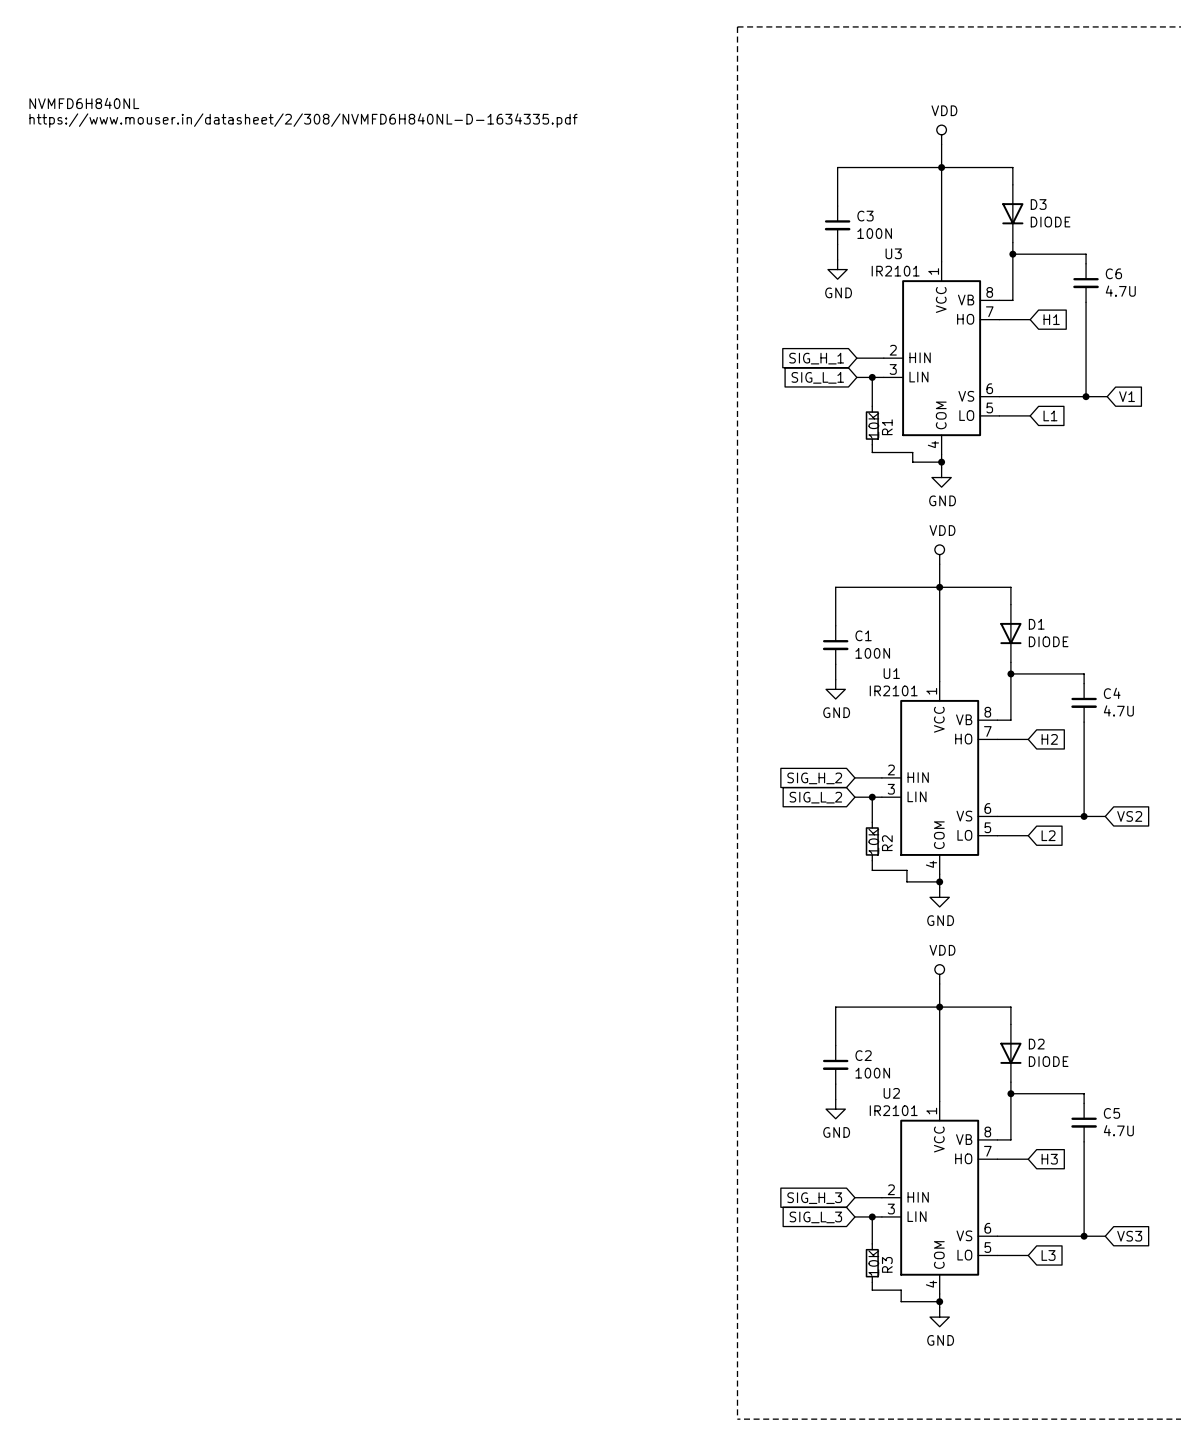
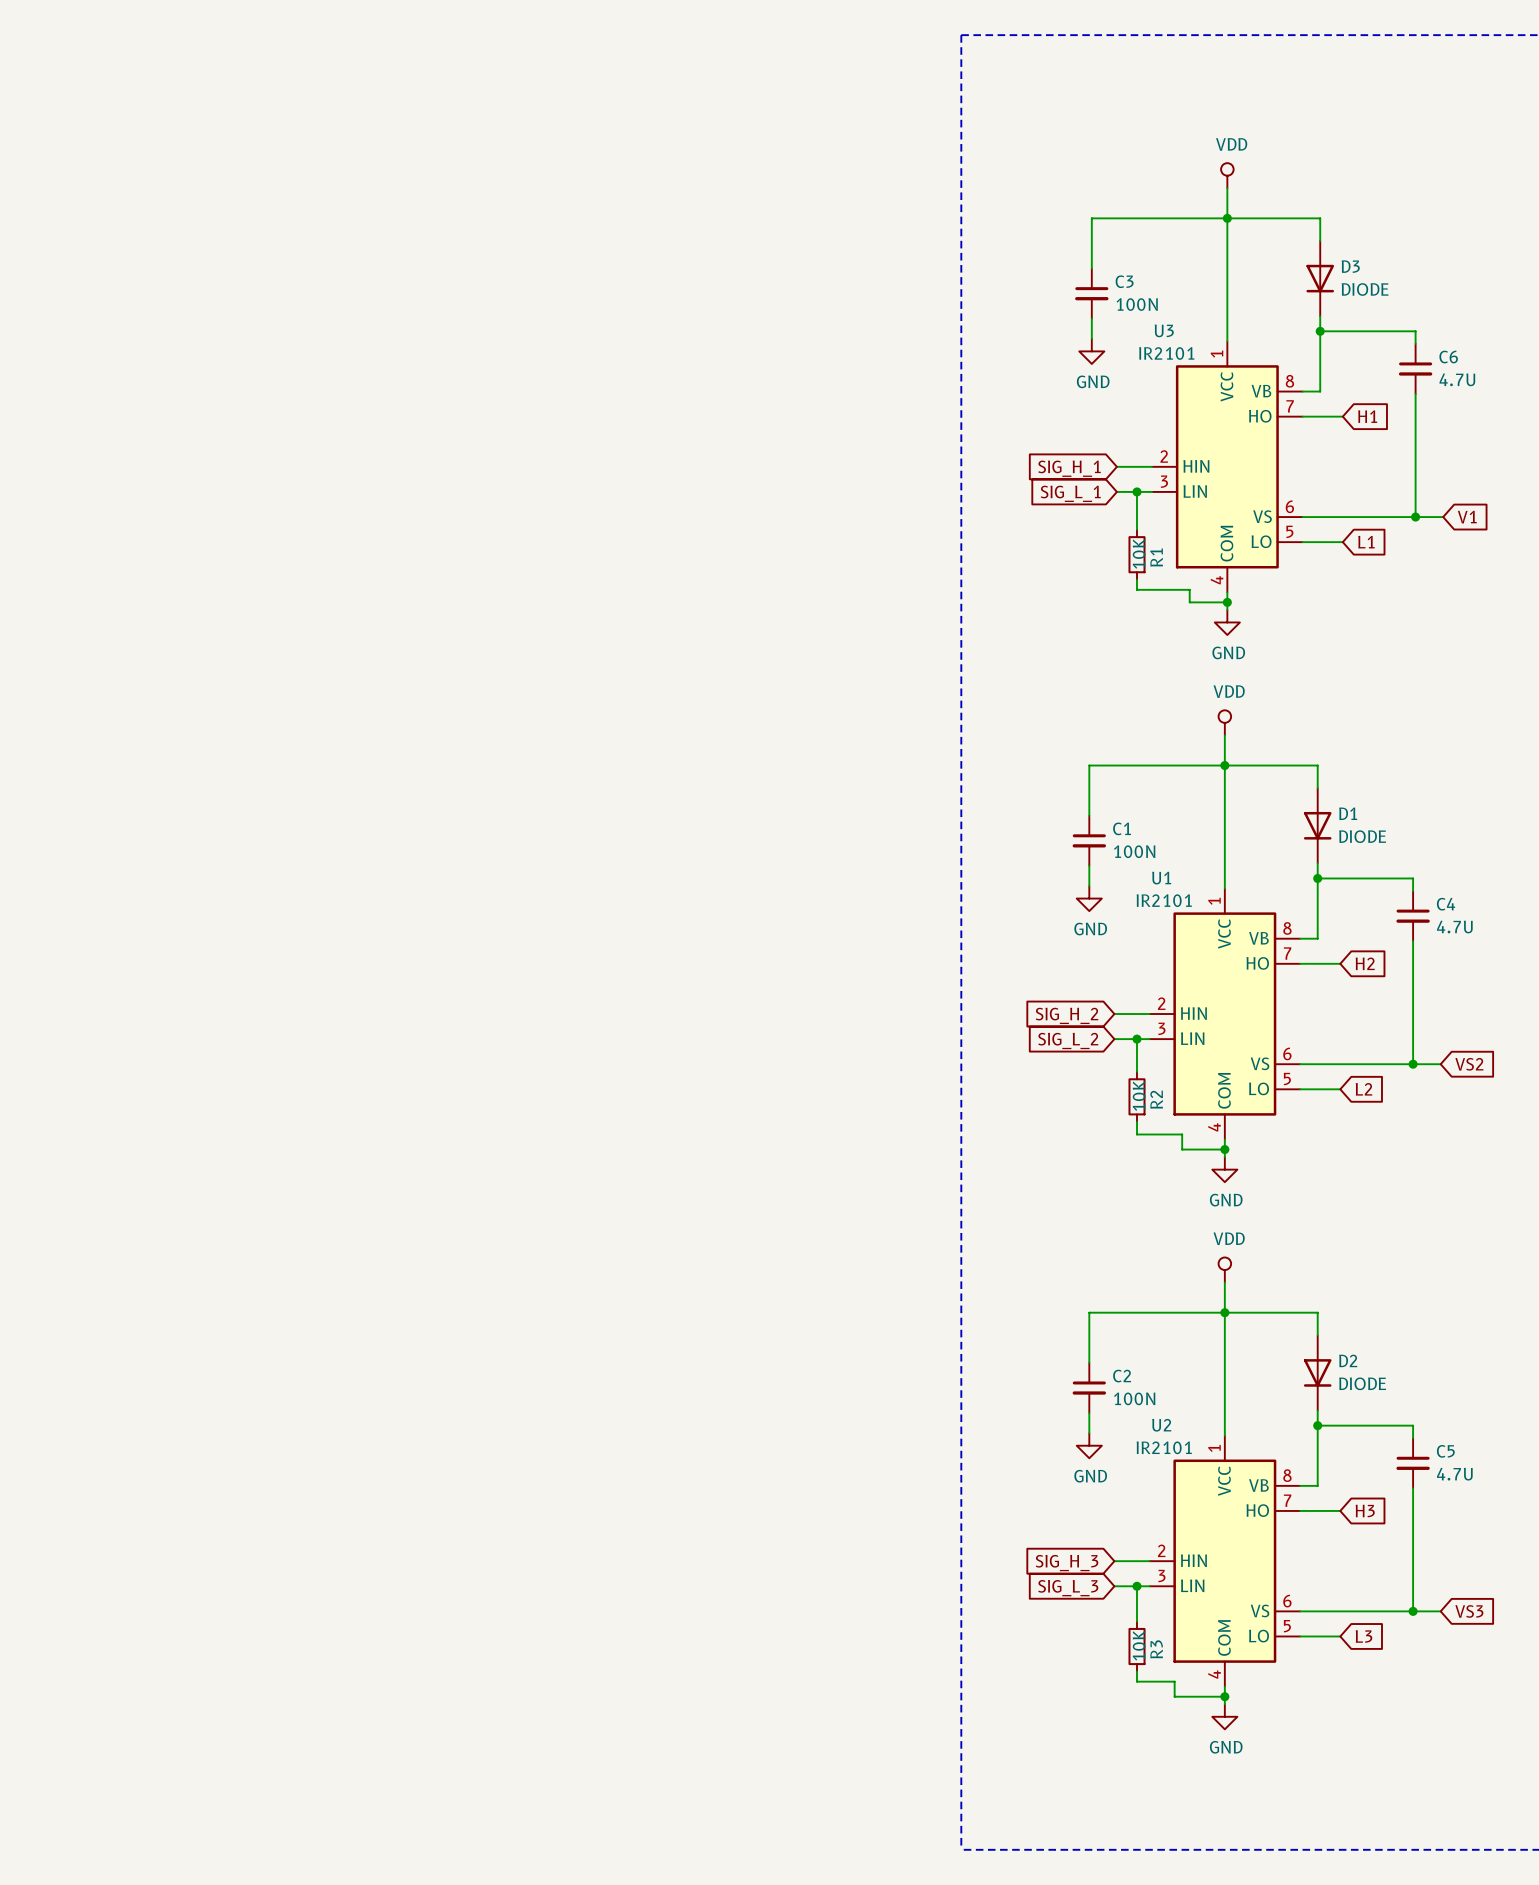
text: NVMFD6H840NL (84, 103) -> none
text: https://www.mouser.in/datasheet/2/308/NVMFD6H840NL-D-1634335.pdf (303, 120) -> none

